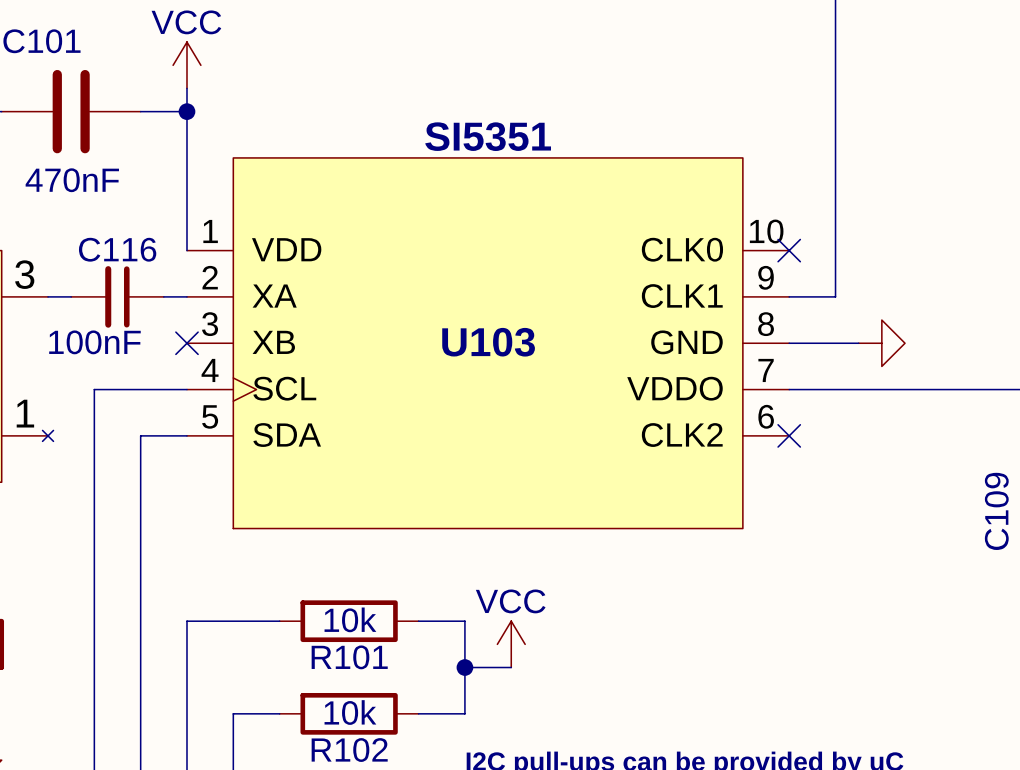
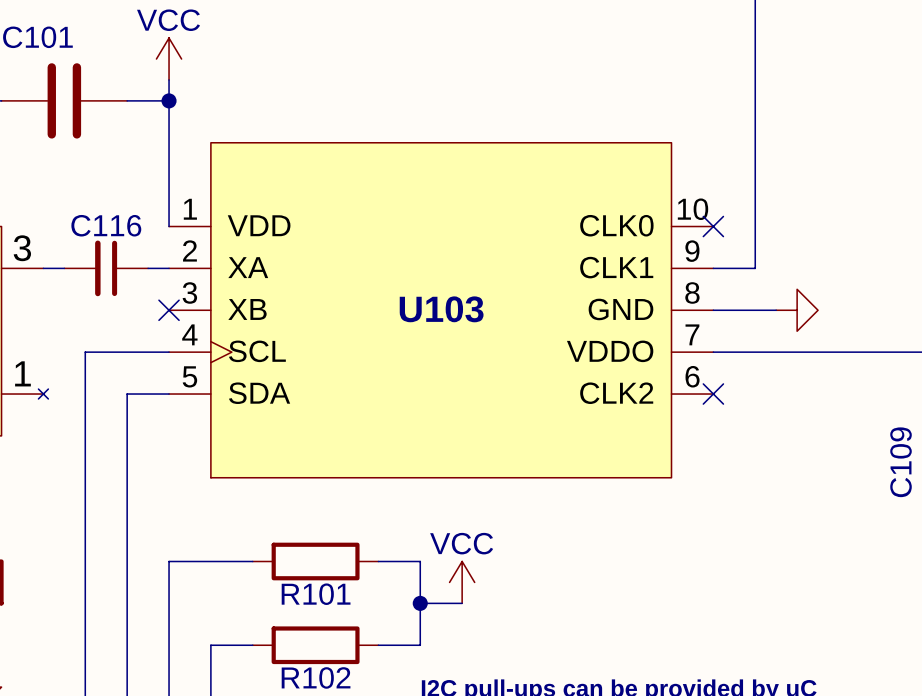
U103 value: SI5351 (488, 136) -> none
C101 value: 470nF (72, 180) -> none
C116 value: 100nF (94, 342) -> none
R101 value: 10k (350, 619) -> none
R102 value: 10k (350, 712) -> none

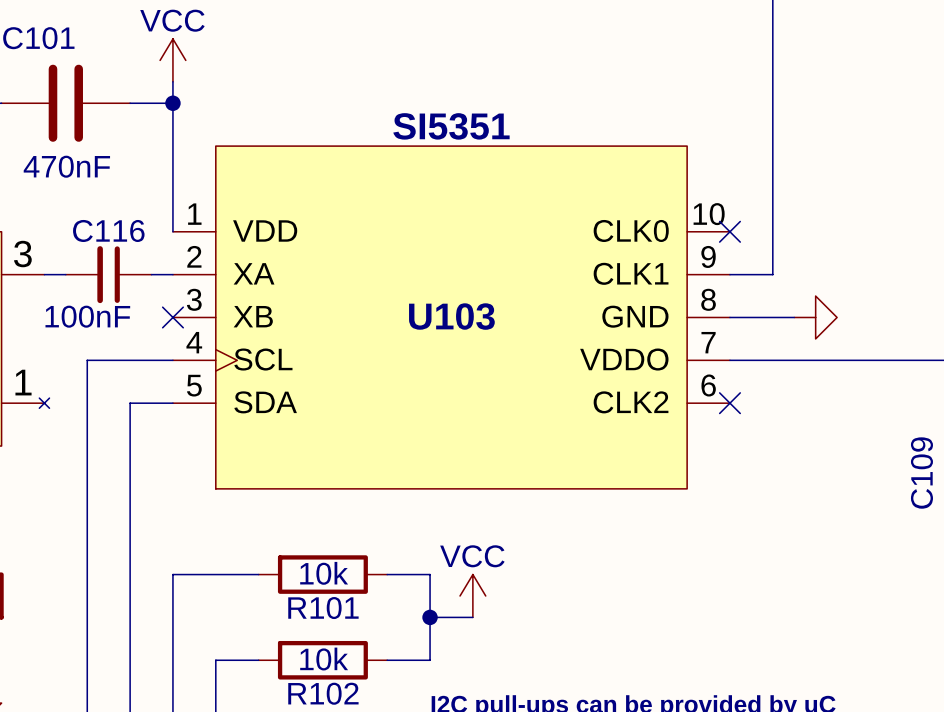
U103 value: none -> SI5351 (451, 126)
C101 value: none -> 470nF (66, 166)
C116 value: none -> 100nF (87, 316)
R101 value: none -> 10k (324, 573)
R102 value: none -> 10k (324, 659)

